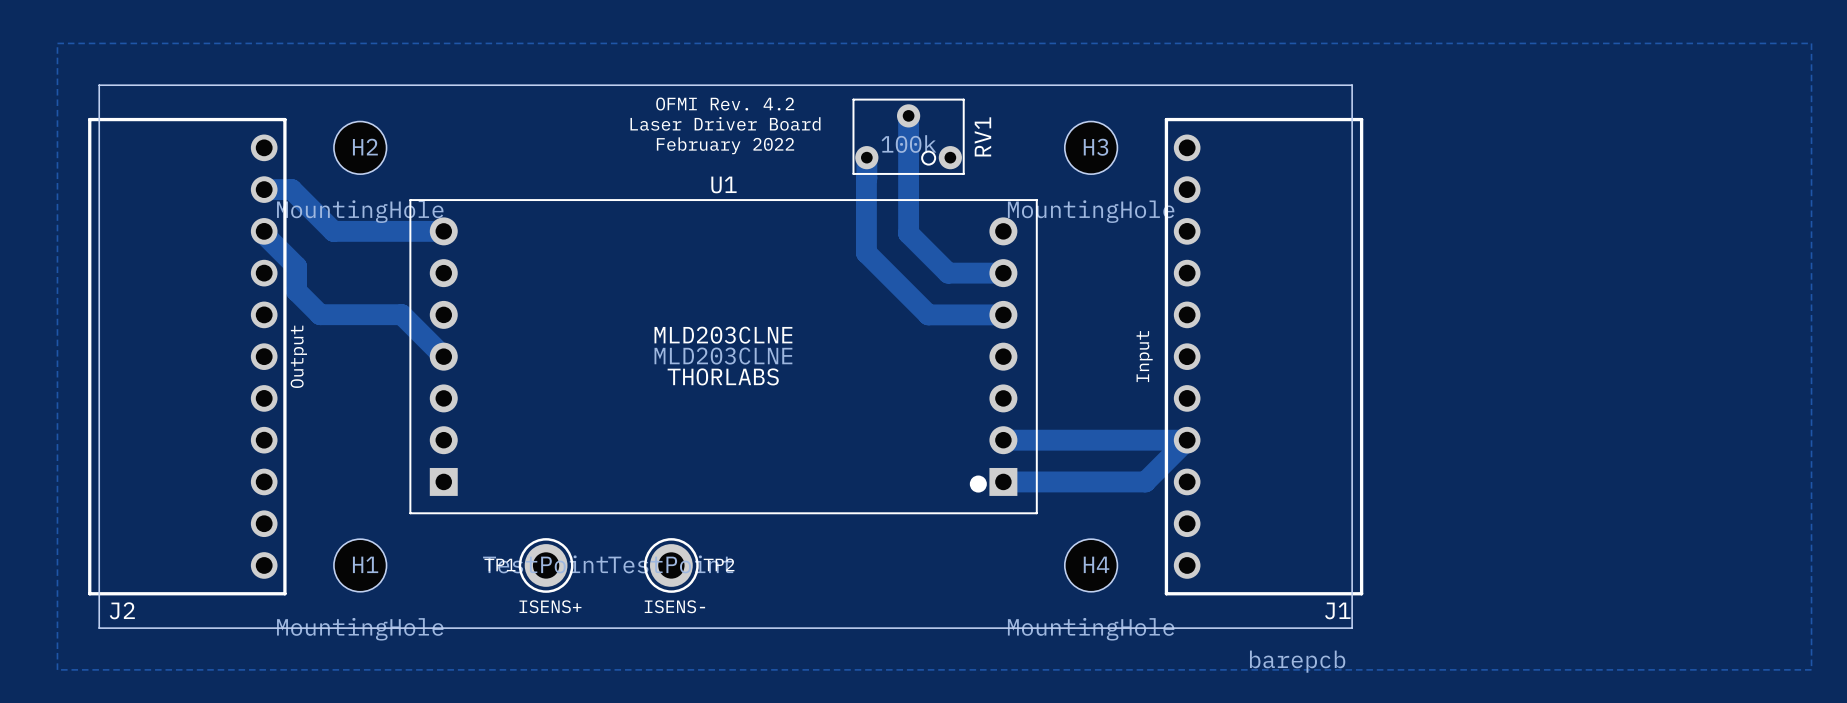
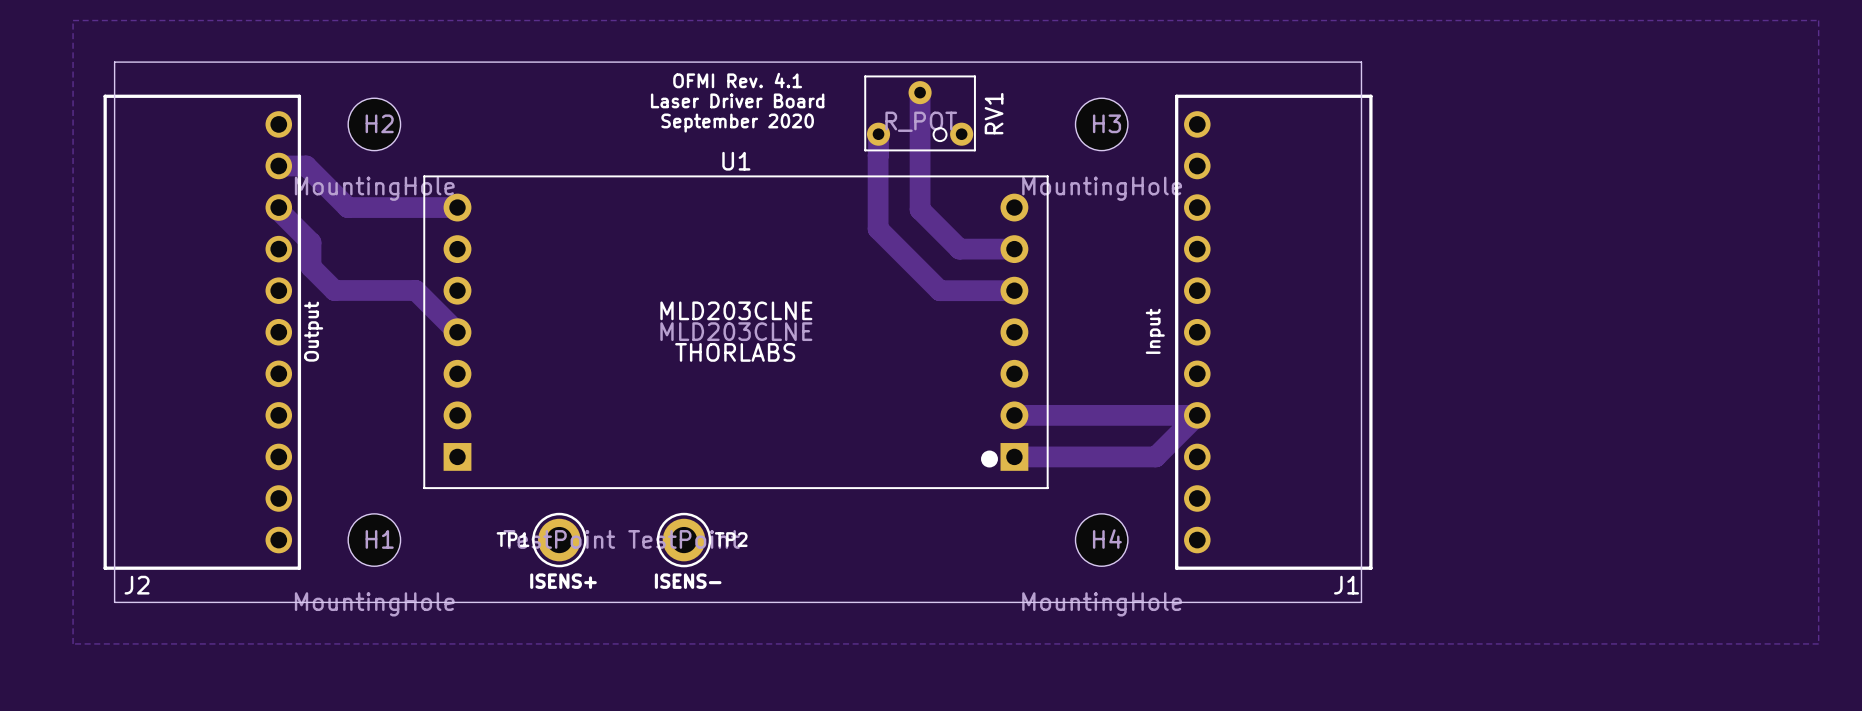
text: OFMI Rev. 4.2 (725, 104) -> OFMI Rev. 4.1 (737, 80)
RV1 value: 100k (908, 144) -> R_POT (921, 121)
text: February 2022 (725, 145) -> September 2020 (737, 123)
drawing: [1249, 650, 1346, 673] -> none

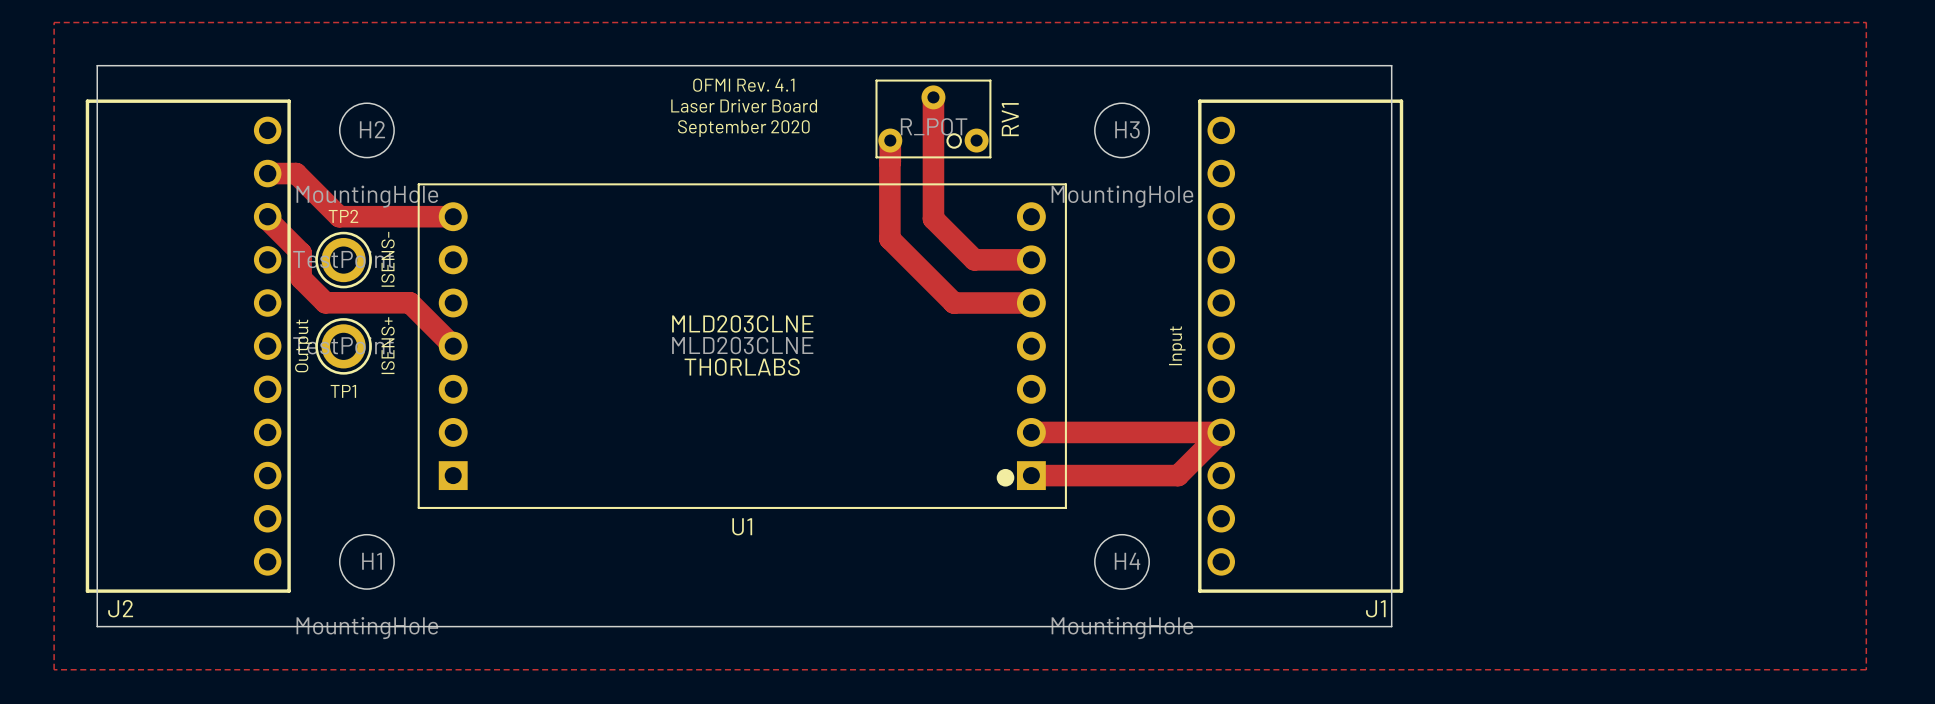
U1 name position: U1 (736, 161) -> U1 (742, 526)
text: none -> ISENS- (388, 259)
TP1 name position: TP1 (513, 539) -> TP1 (343, 391)
TP2 name position: TP2 (731, 539) -> TP2 (343, 216)
TP1 position: (559, 540) -> (343, 346)
TP2 position: (684, 540) -> (343, 260)
text rotation: 0° (563, 581) -> 90° counterclockwise (388, 345)
text position: ISENS+ (563, 581) -> ISENS+ (388, 345)
text: ISENS- (688, 581) -> none

